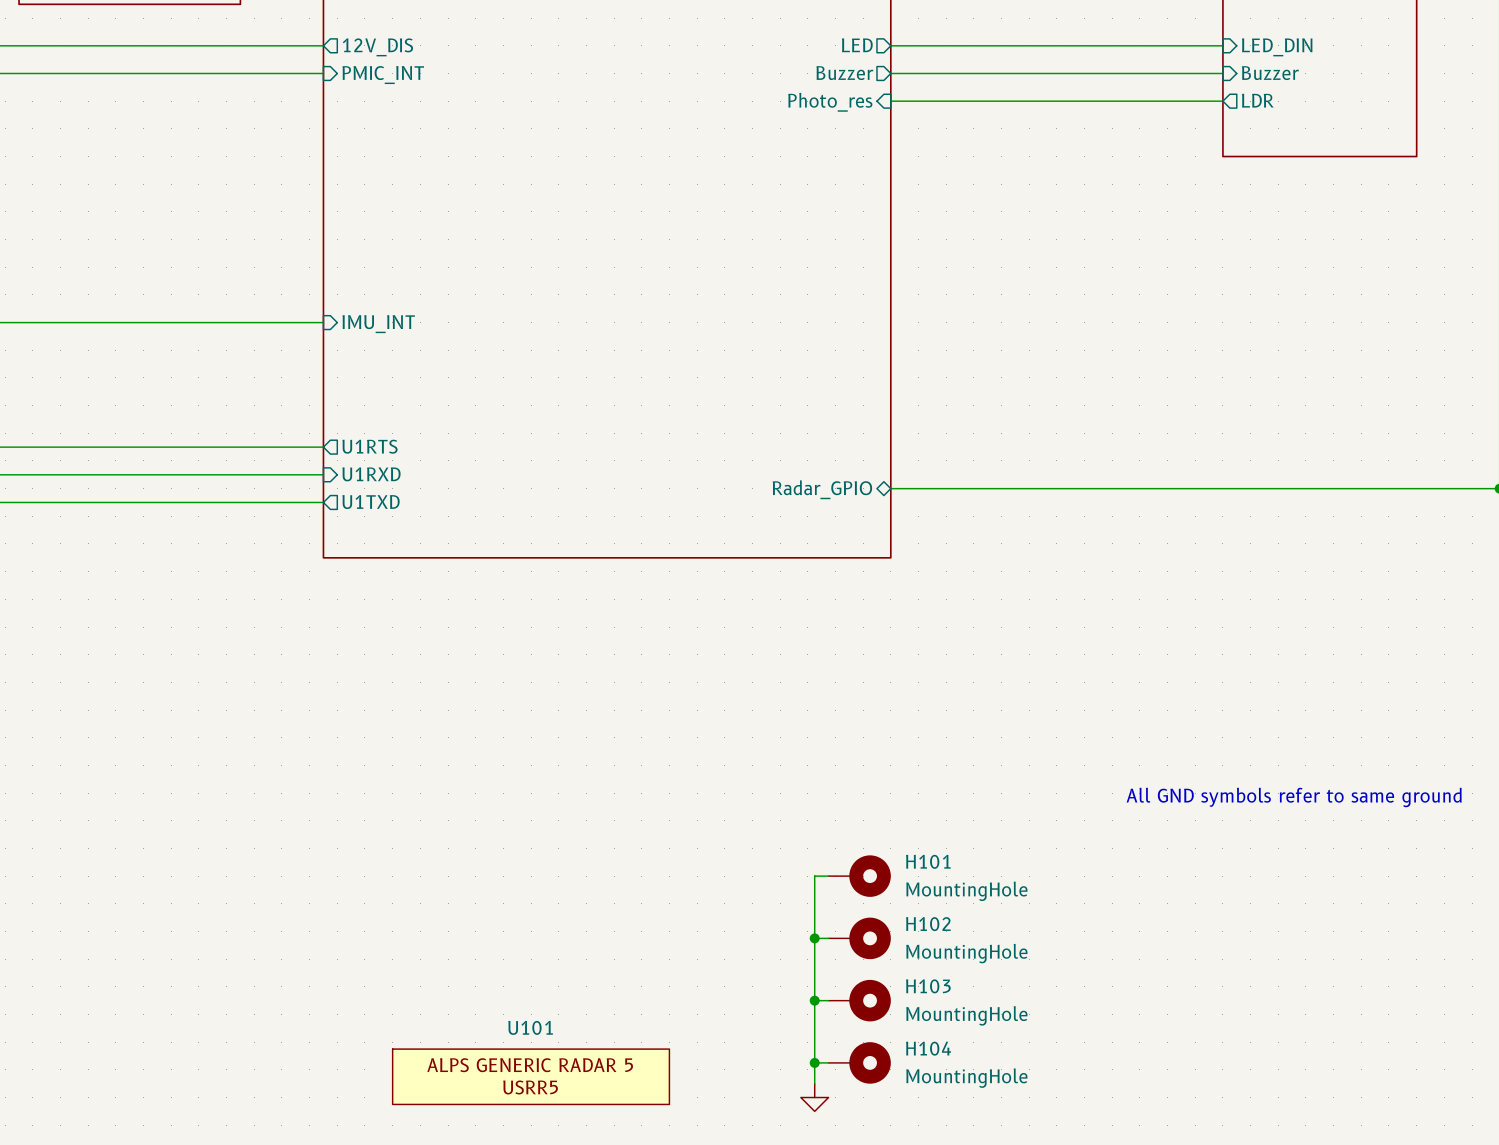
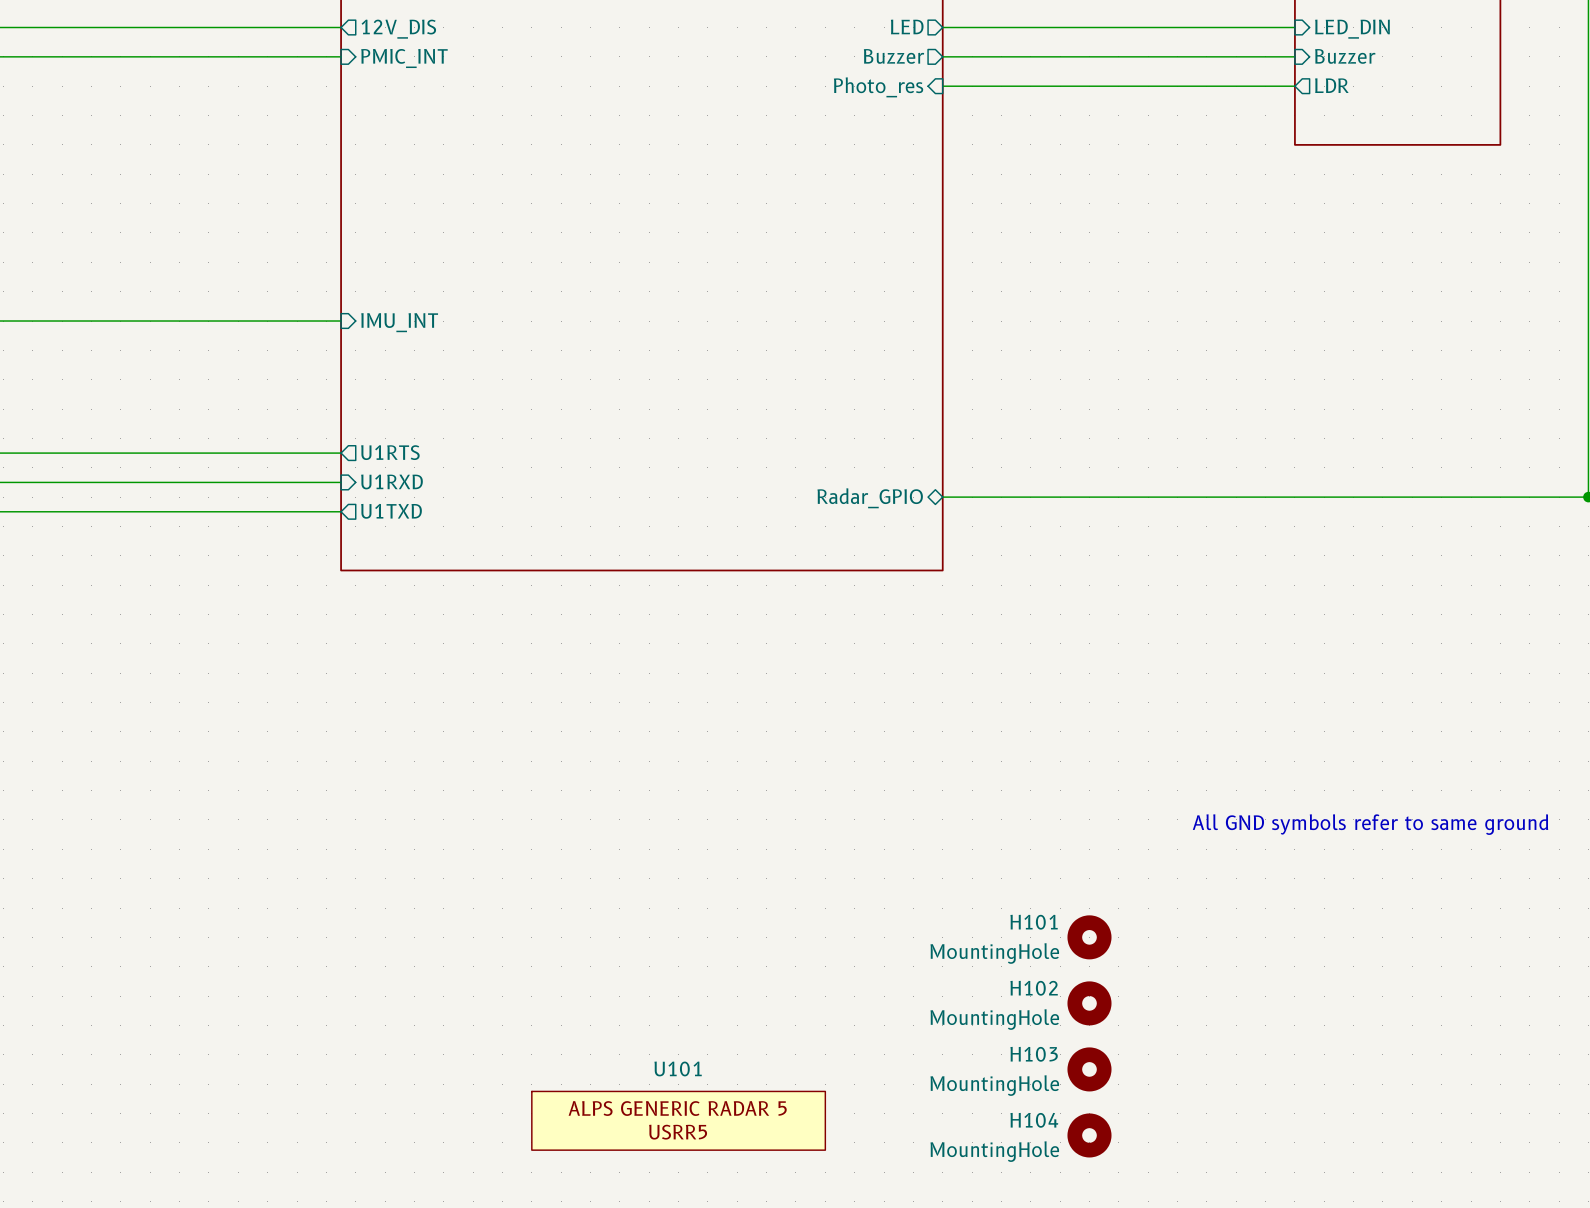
H101 symbol: [828, 855, 891, 897] -> [1067, 915, 1112, 960]
H101 name position: H101 (928, 861) -> H101 (1034, 922)
wire: (828, 876) (814, 876) (814, 1083) -> none
H101 value position: MountingHole (966, 891) -> MountingHole (994, 953)
H102 symbol: [828, 917, 891, 960] -> [1067, 981, 1112, 1026]
H102 name position: H102 (928, 924) -> H102 (1034, 988)
wire: (814, 938) (828, 938) -> none
junction: (814, 938) -> none
H102 value position: MountingHole (966, 953) -> MountingHole (994, 1019)
H103 symbol: [828, 979, 891, 1022] -> [1067, 1047, 1112, 1092]
H103 name position: H103 (928, 986) -> H103 (1034, 1054)
wire: (814, 1000) (828, 1000) -> none
junction: (814, 1000) -> none
H103 value position: MountingHole (966, 1015) -> MountingHole (994, 1085)
H104 symbol: [828, 1042, 891, 1084] -> [1067, 1113, 1112, 1158]
H104 name position: H104 (928, 1048) -> H104 (1034, 1120)
wire: (814, 1062) (828, 1062) -> none
junction: (814, 1062) -> none
U101 position: (531, 1076) -> (678, 1120)
H104 value position: MountingHole (966, 1078) -> MountingHole (994, 1151)
power symbol: (814, 1097) -> none

